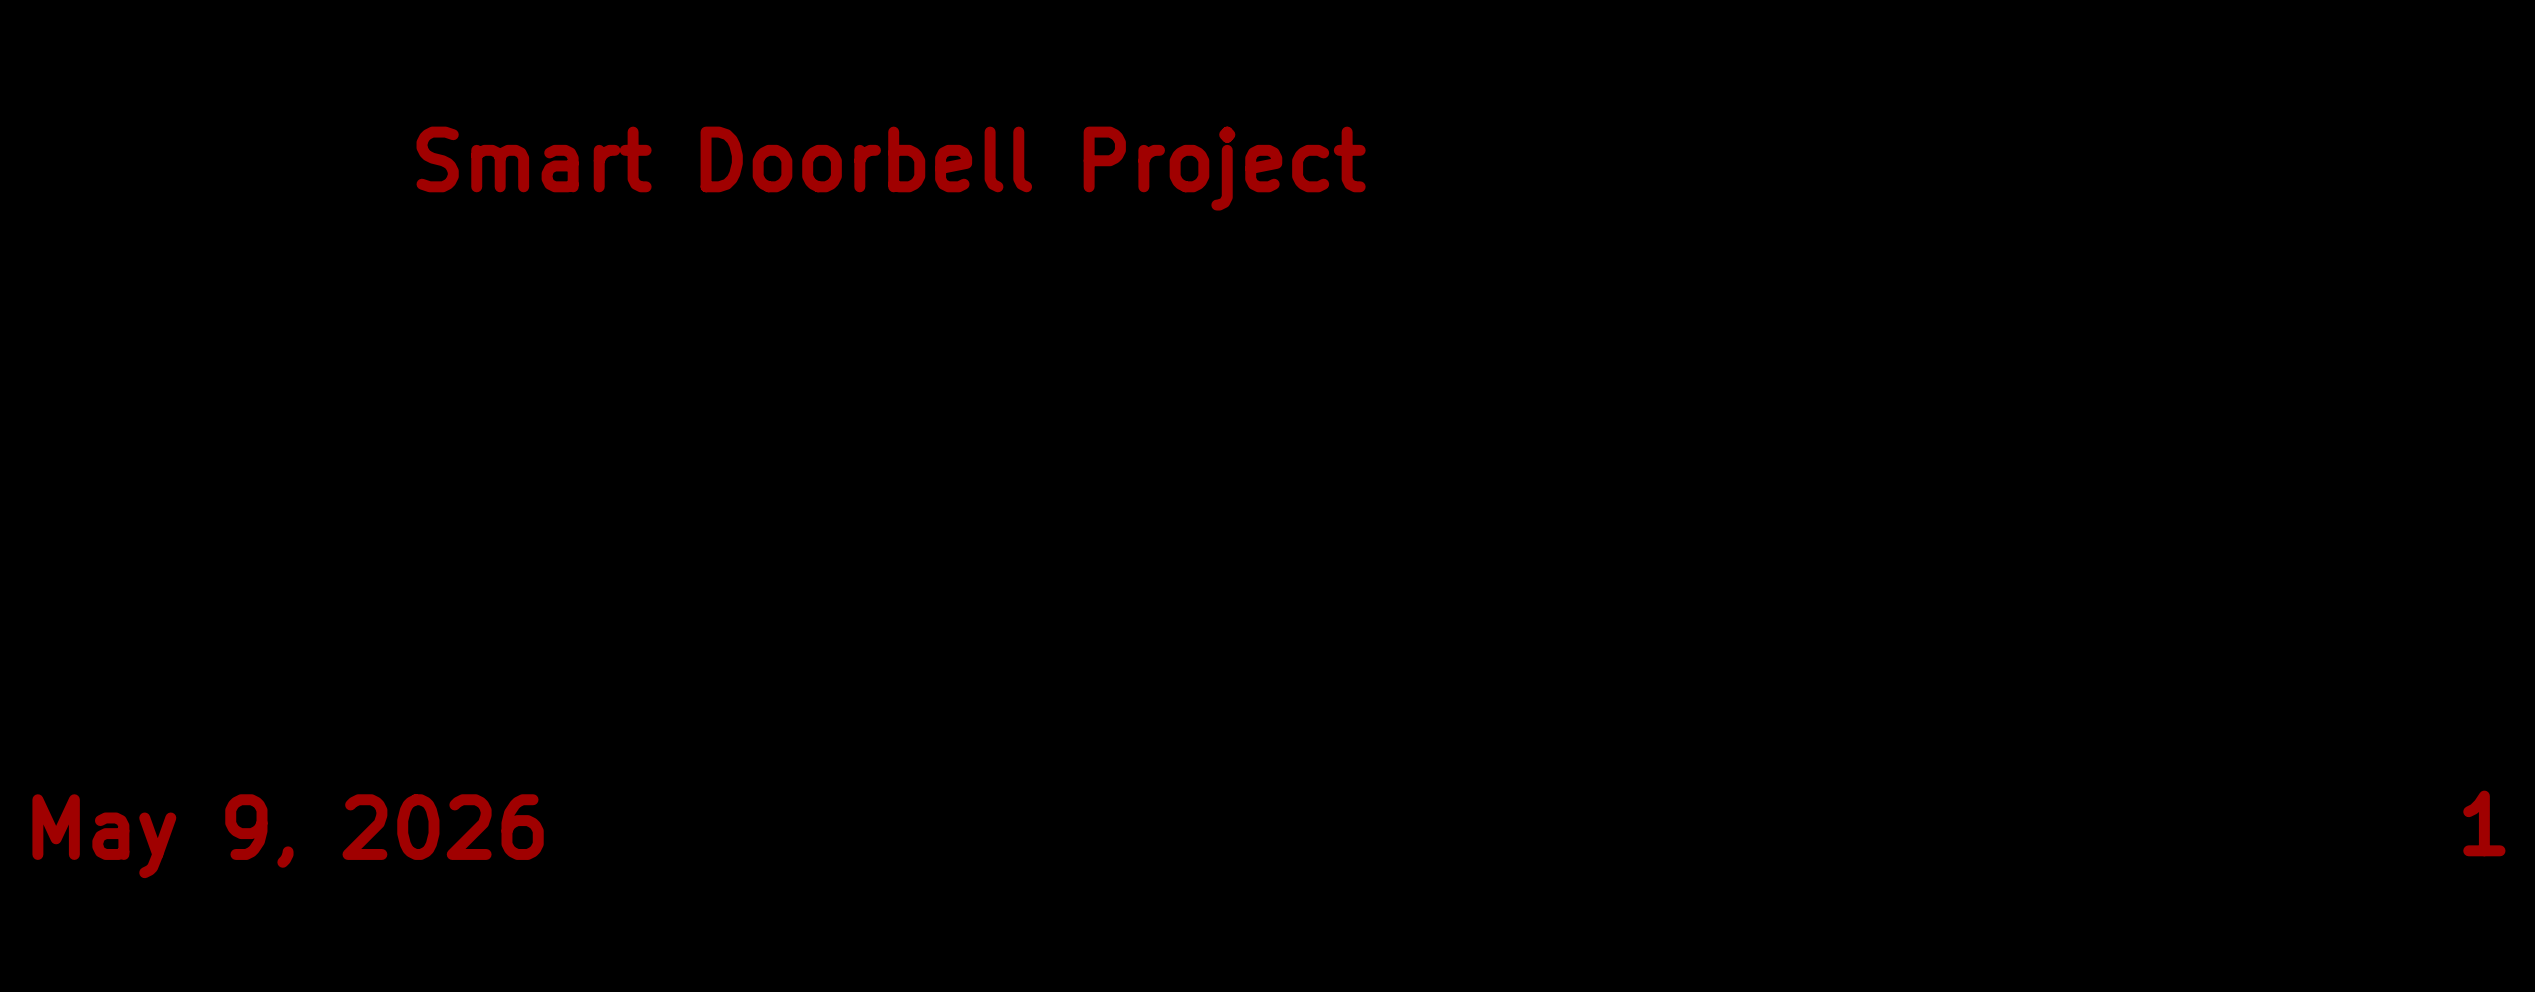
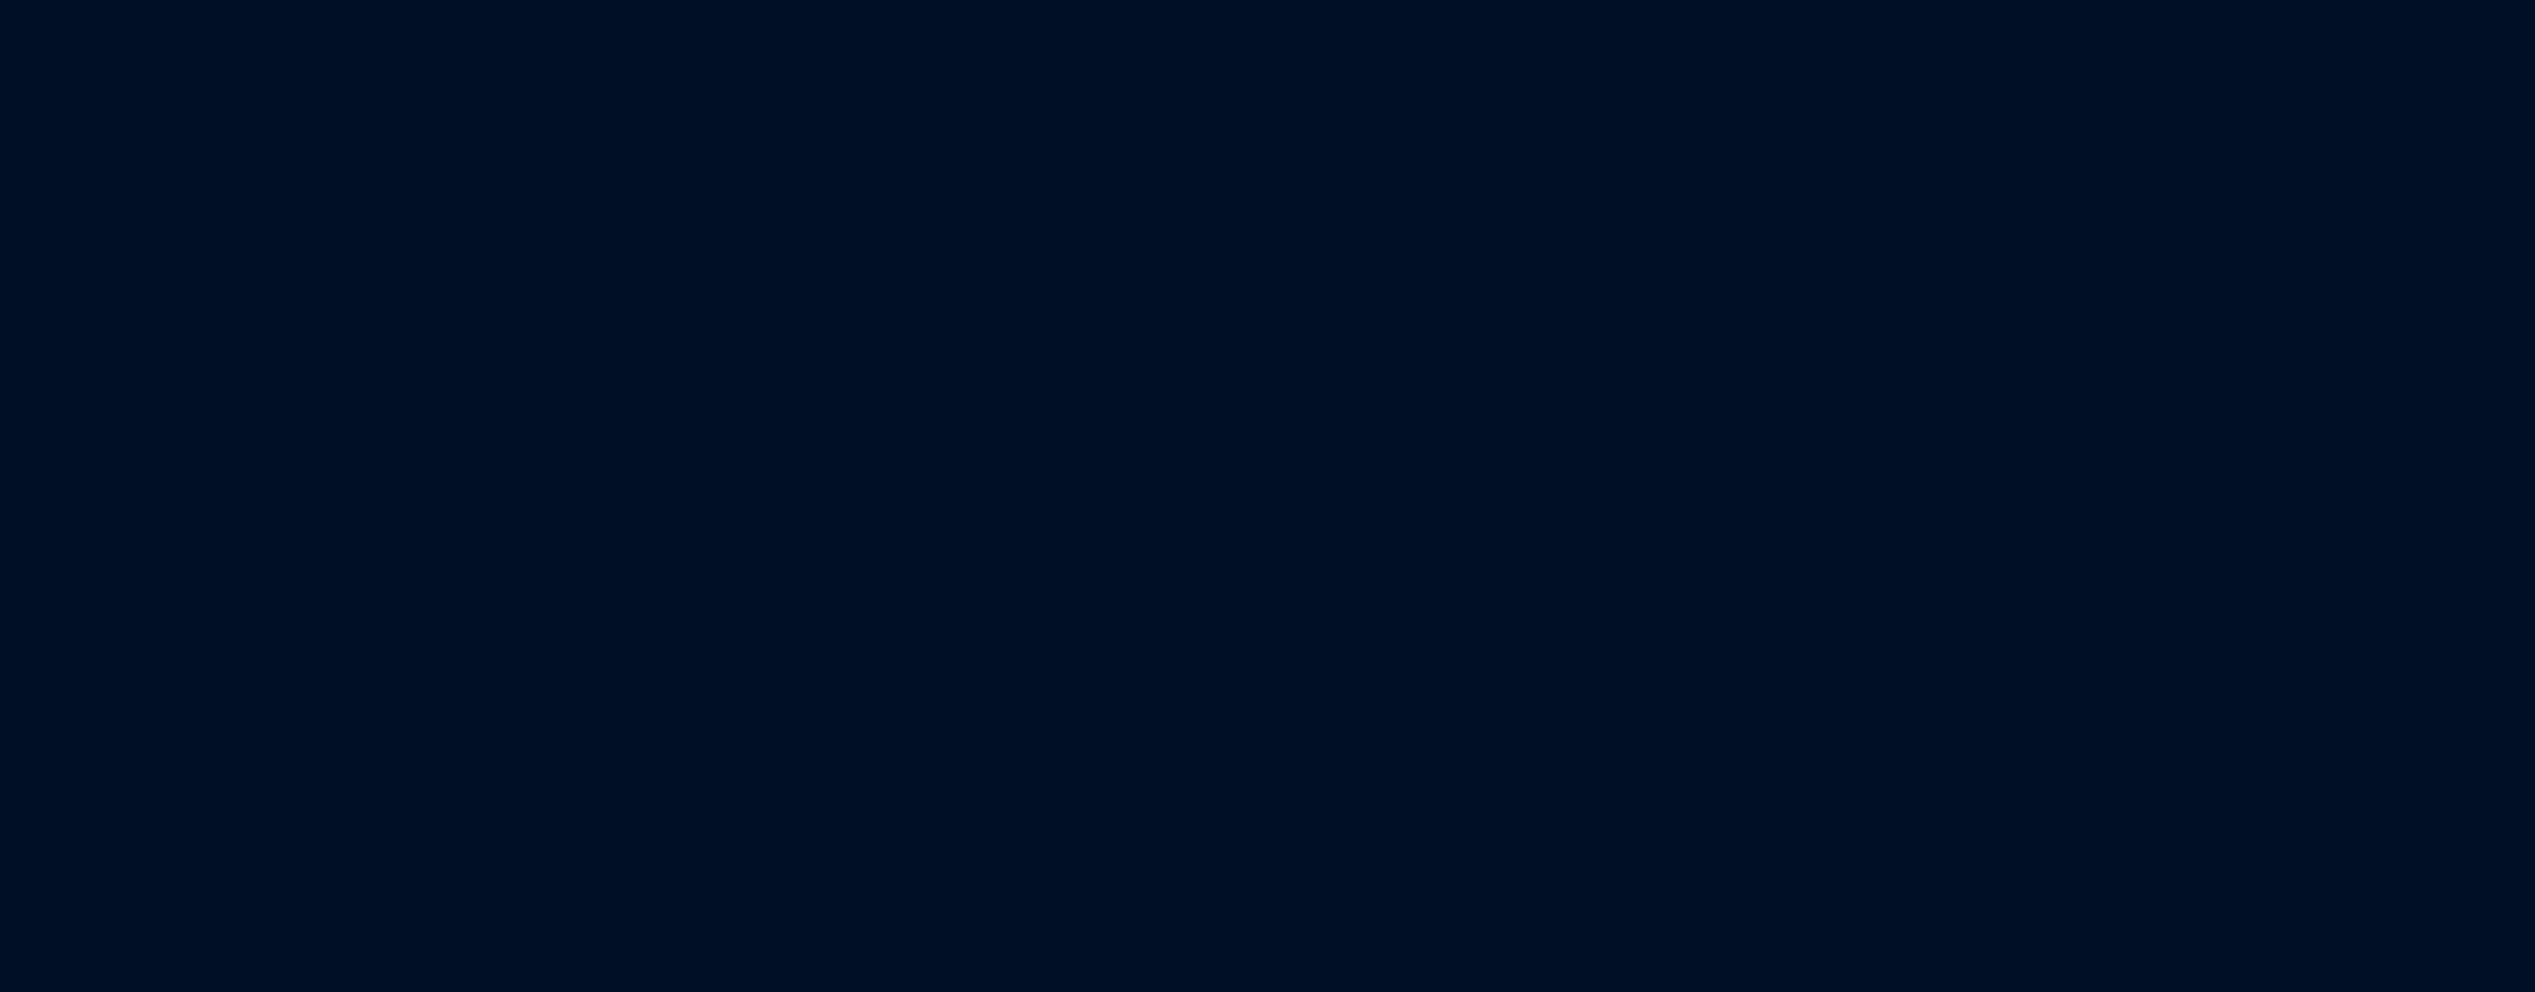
text: Smart Doorbell Project (891, 168) -> none
text: 1 (2484, 823) -> none
text: May 9, 2026 (288, 836) -> none

